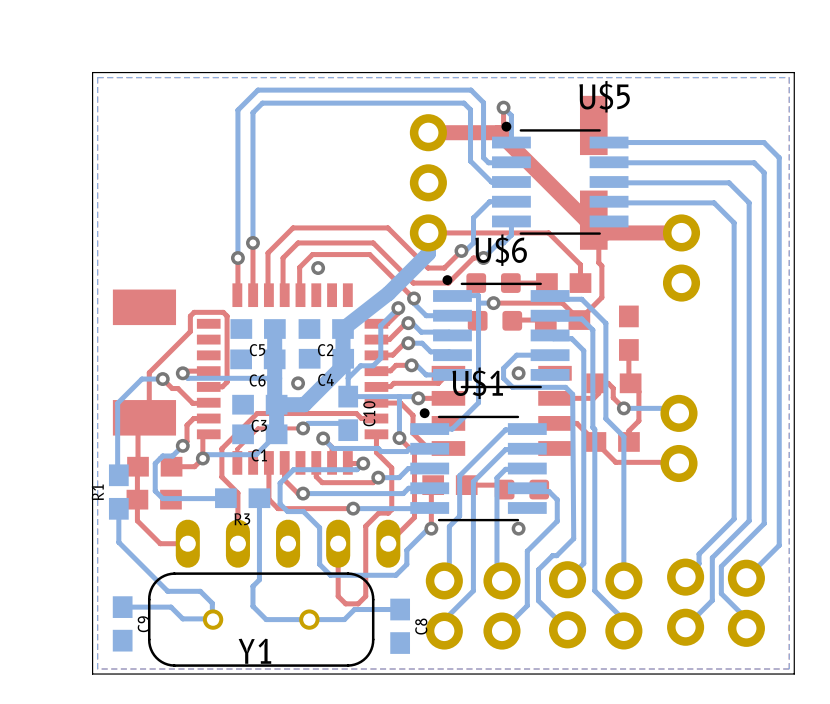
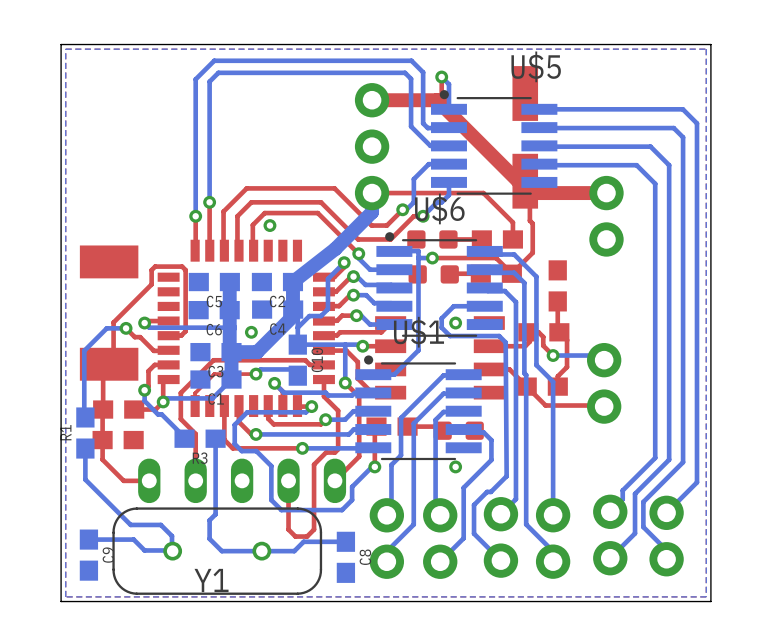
bottom track: (182, 445) (172, 455) (162, 455) (155, 463) (155, 491) (162, 498) (225, 498) (223, 498) -> (144, 390) (144, 401) (158, 414) (161, 414) (184, 438)

